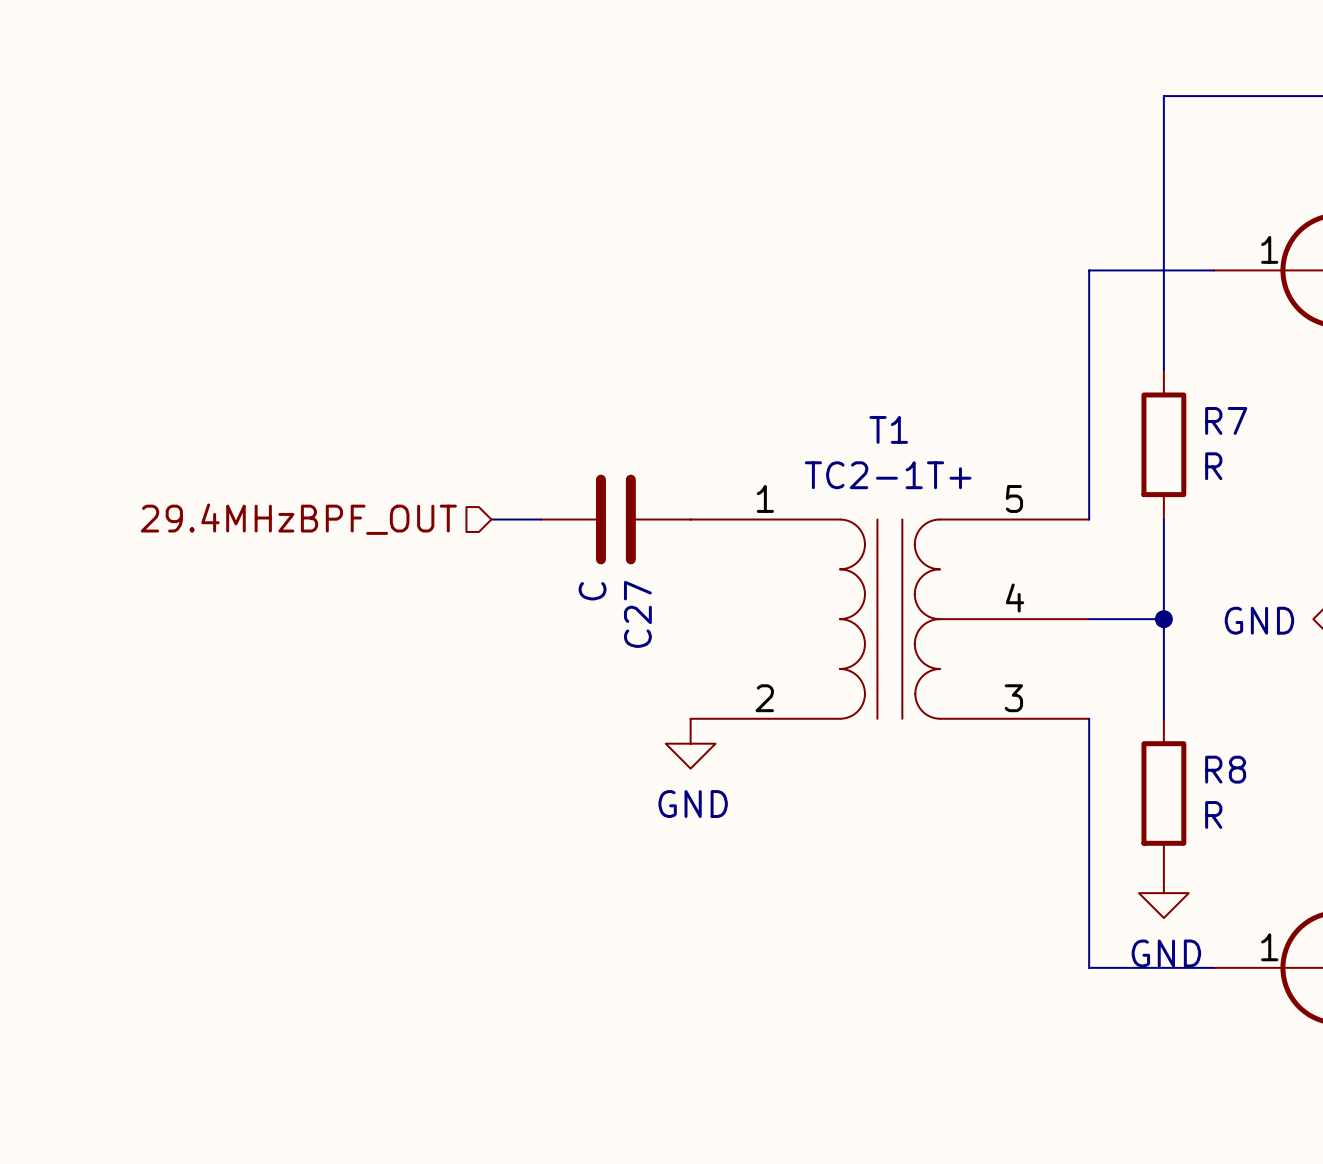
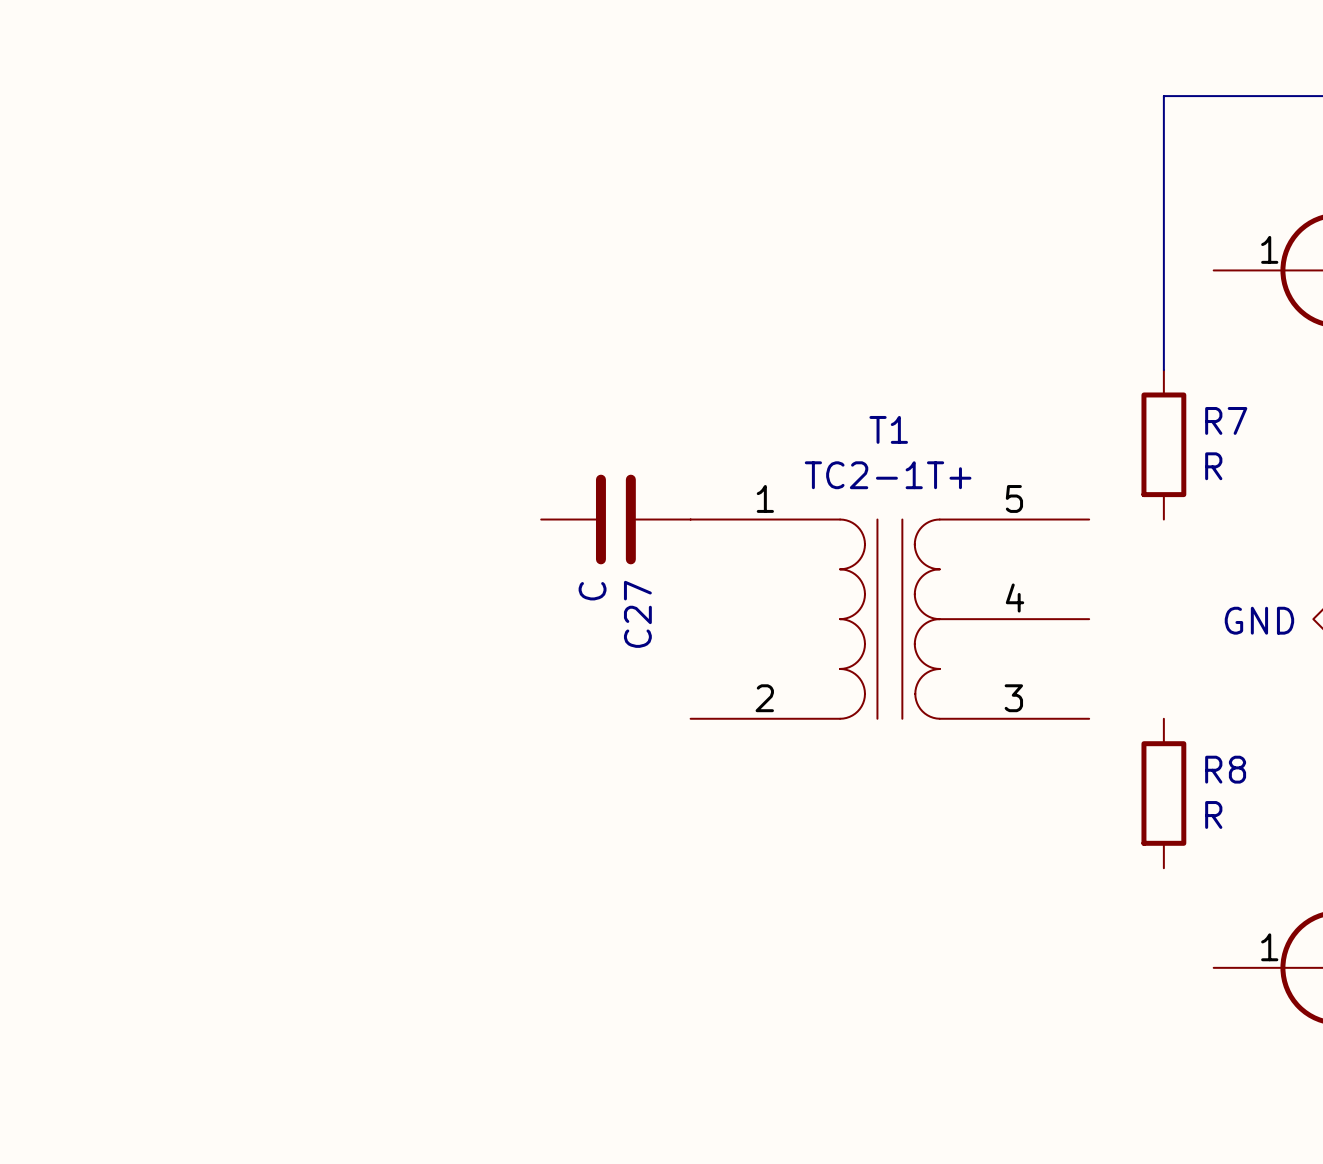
wire: (1213, 270) (1089, 270) (1089, 519) -> none
hierarchical label: 29.4MHzBPF_OUT (298, 519) -> none
wire: (491, 519) (541, 519) -> none
wire: (1163, 519) (1163, 718) -> none
wire: (1089, 619) (1163, 619) -> none
junction: (1163, 619) -> none
wire: (1089, 718) (1089, 967) (1213, 967) -> none
power symbol: GND (690, 743) -> none
power symbol: GND (1163, 893) -> none

